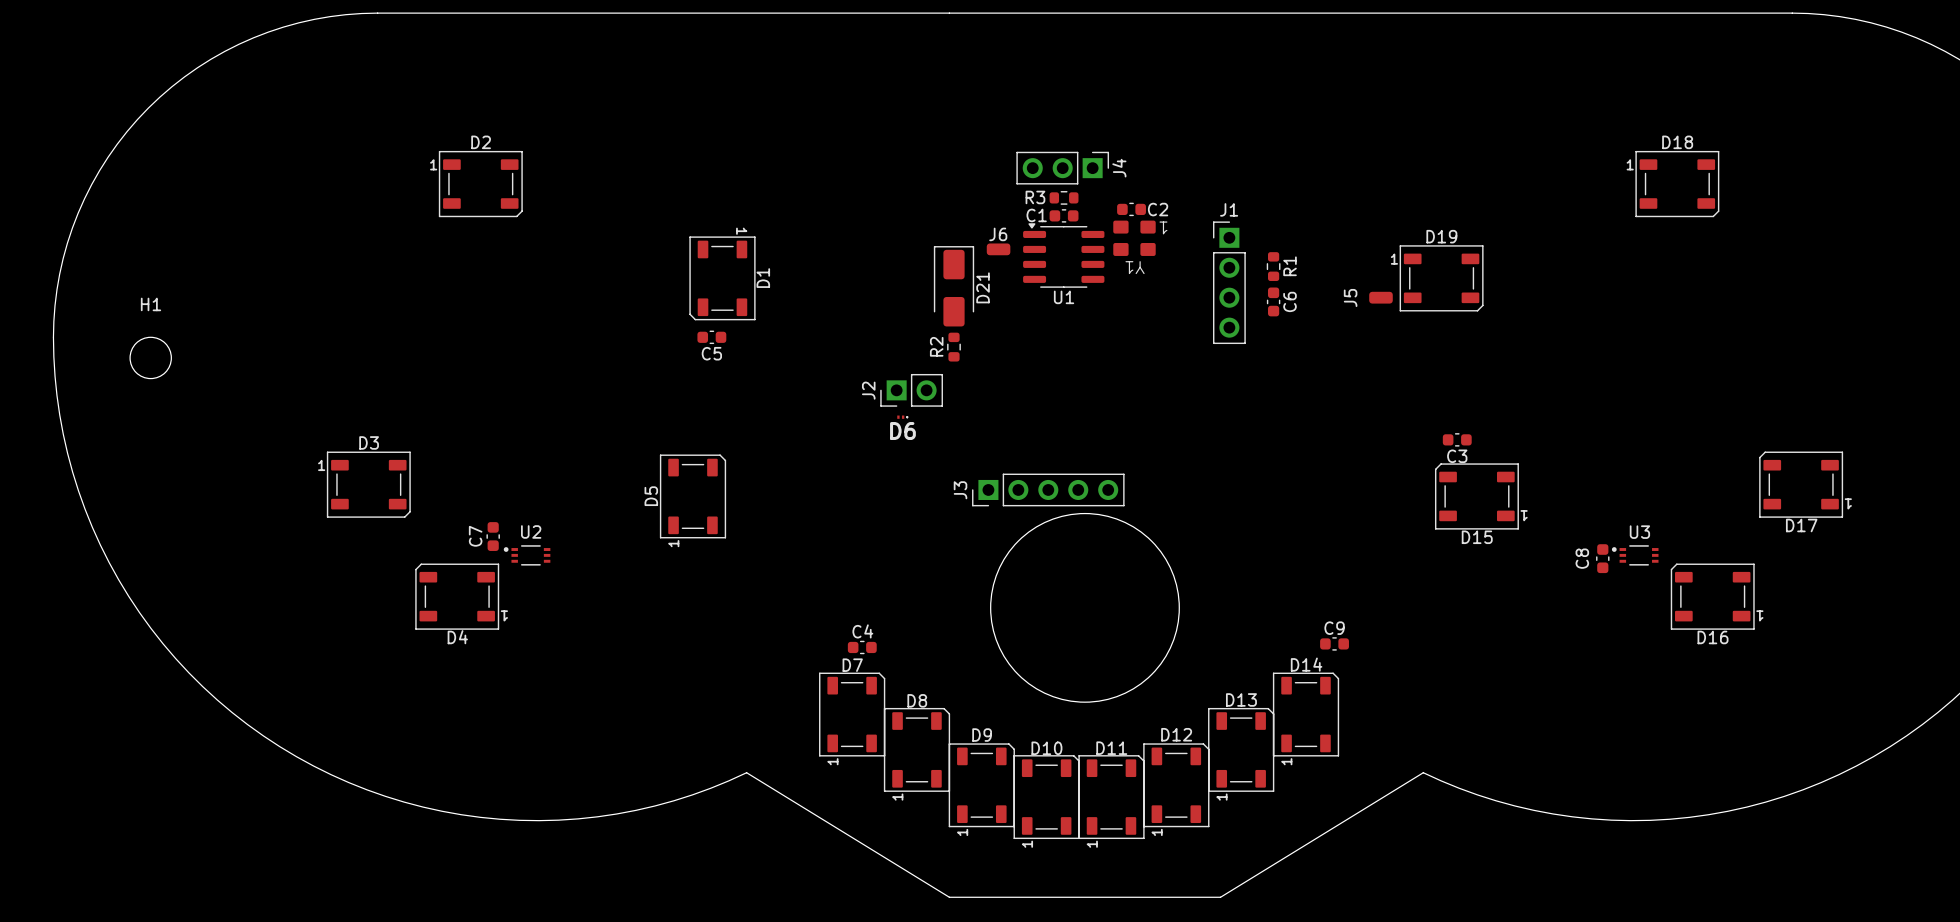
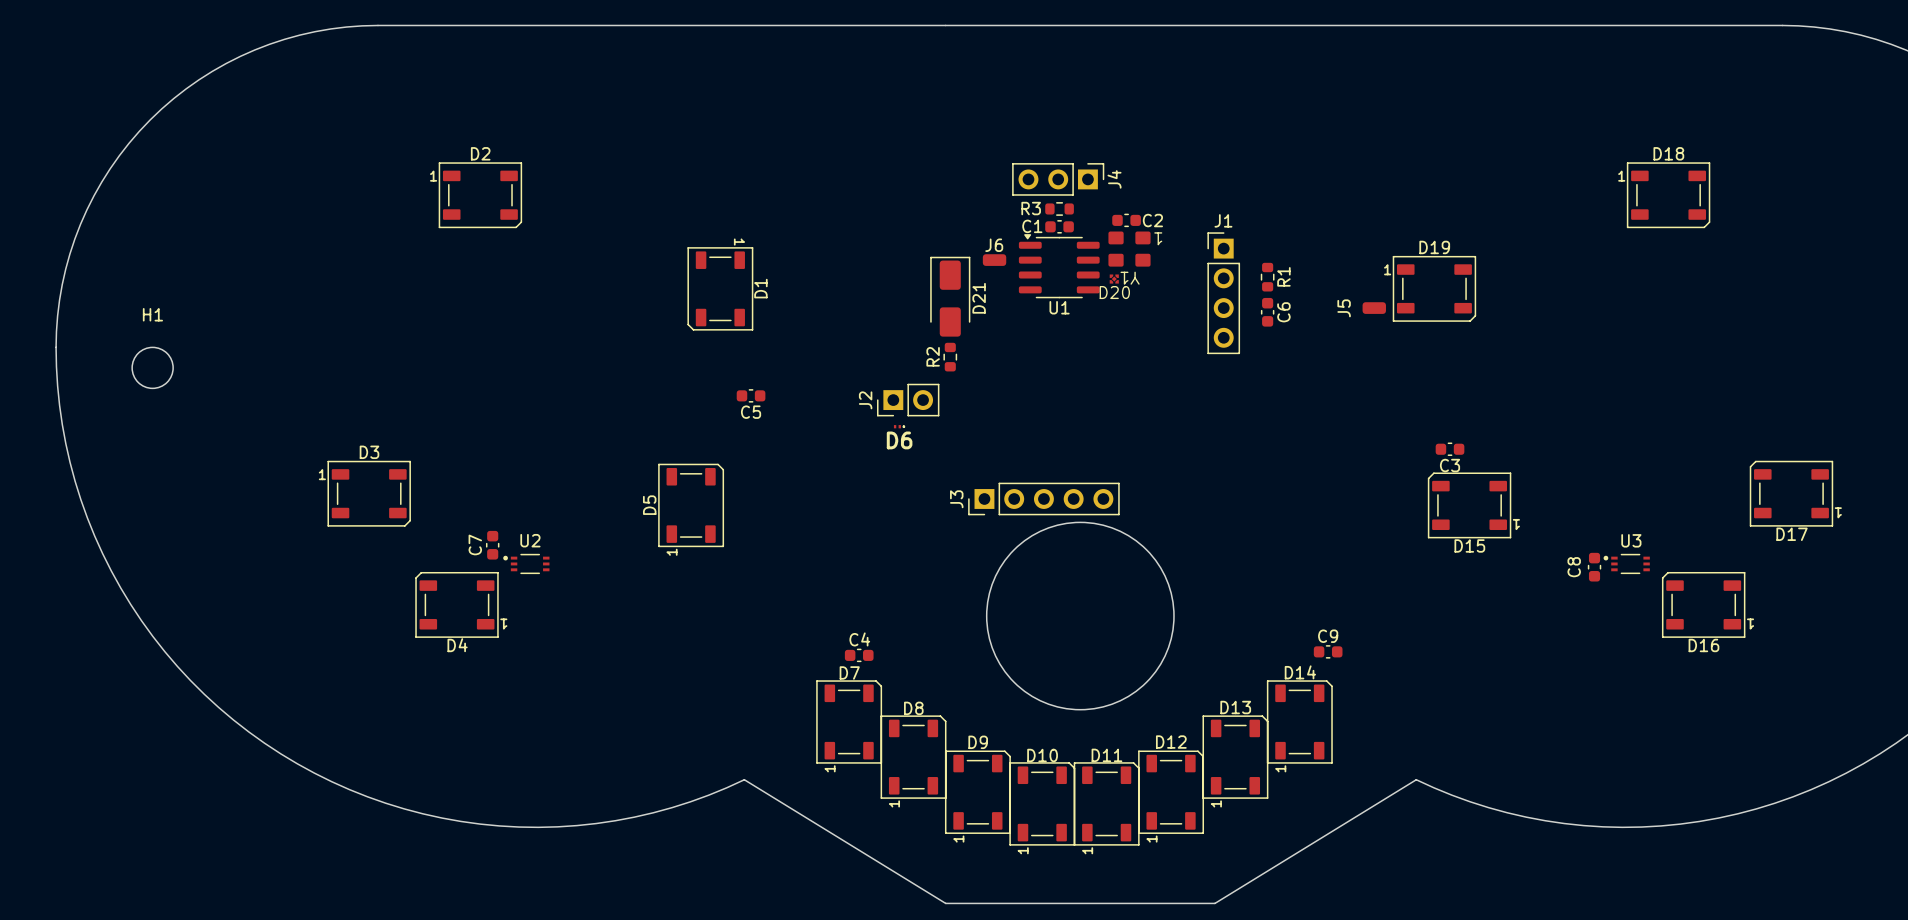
D20: none -> (1114, 279)
C5 position: (711, 337) -> (751, 395)

